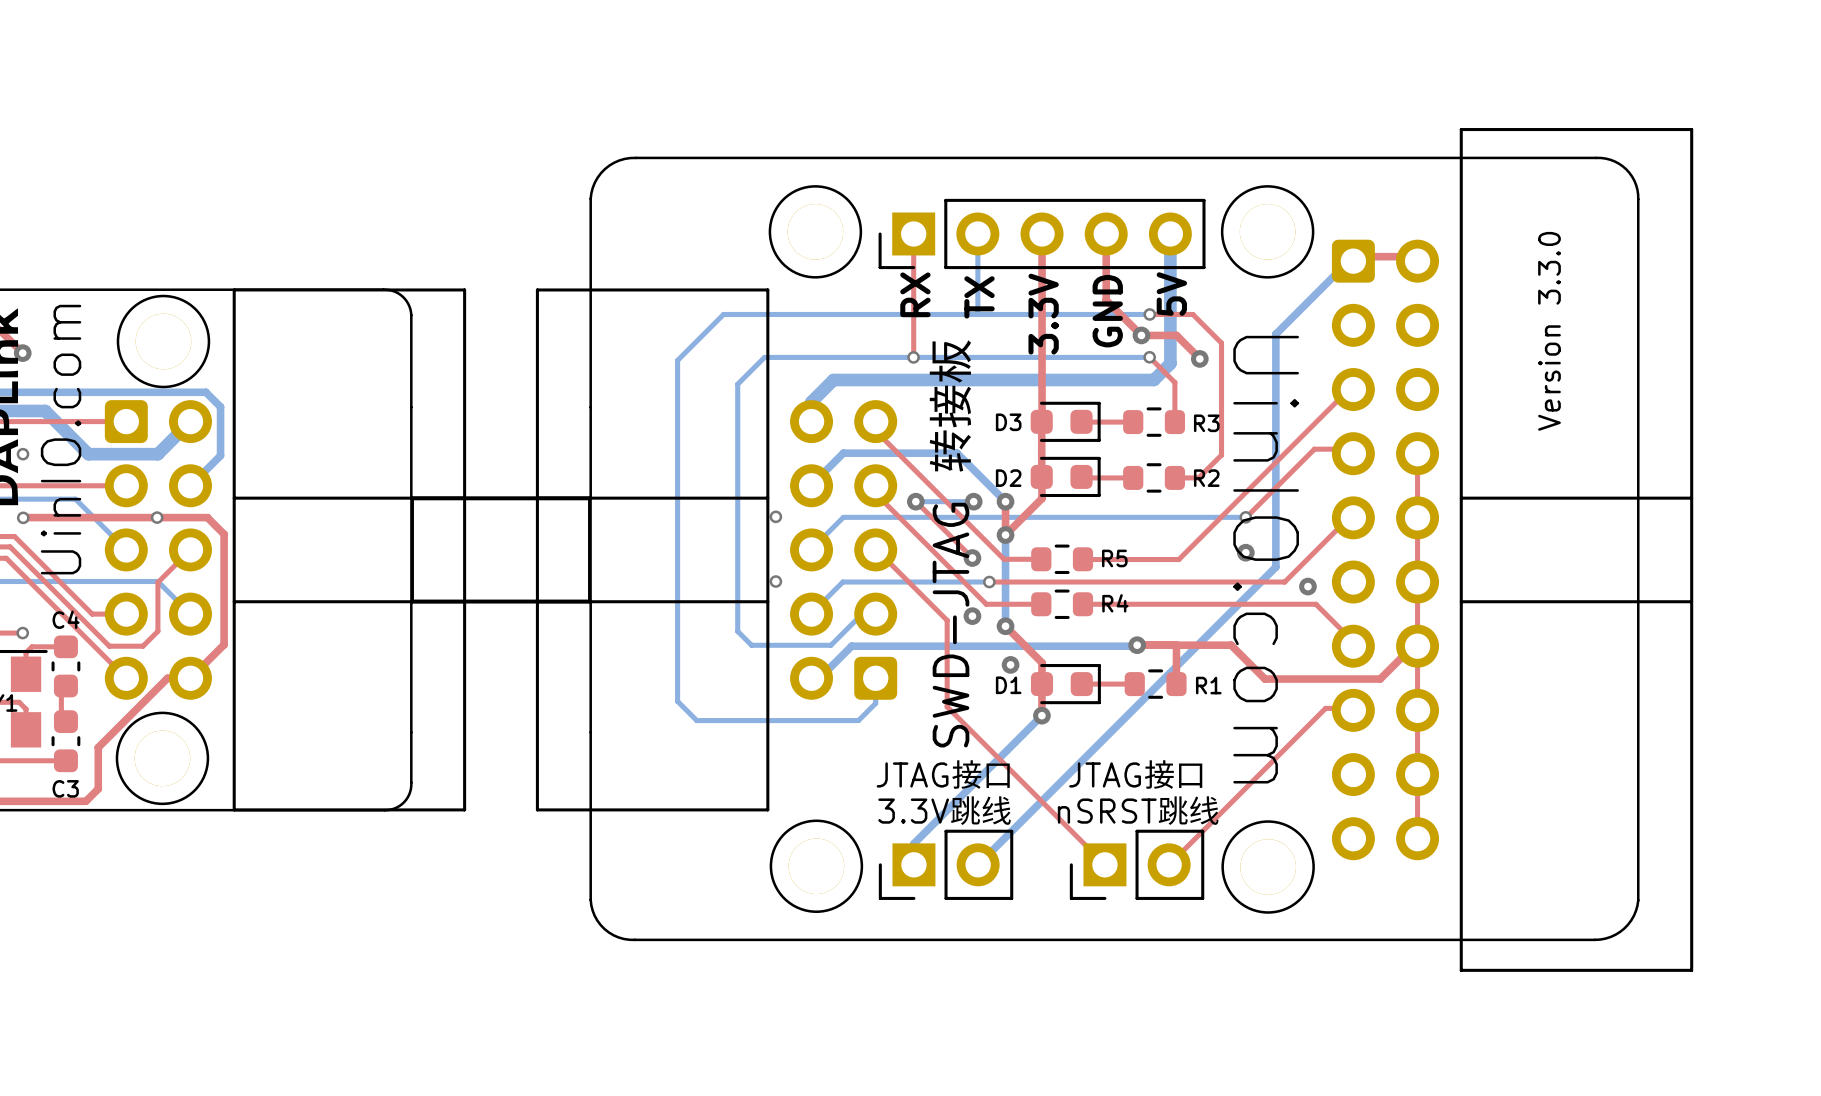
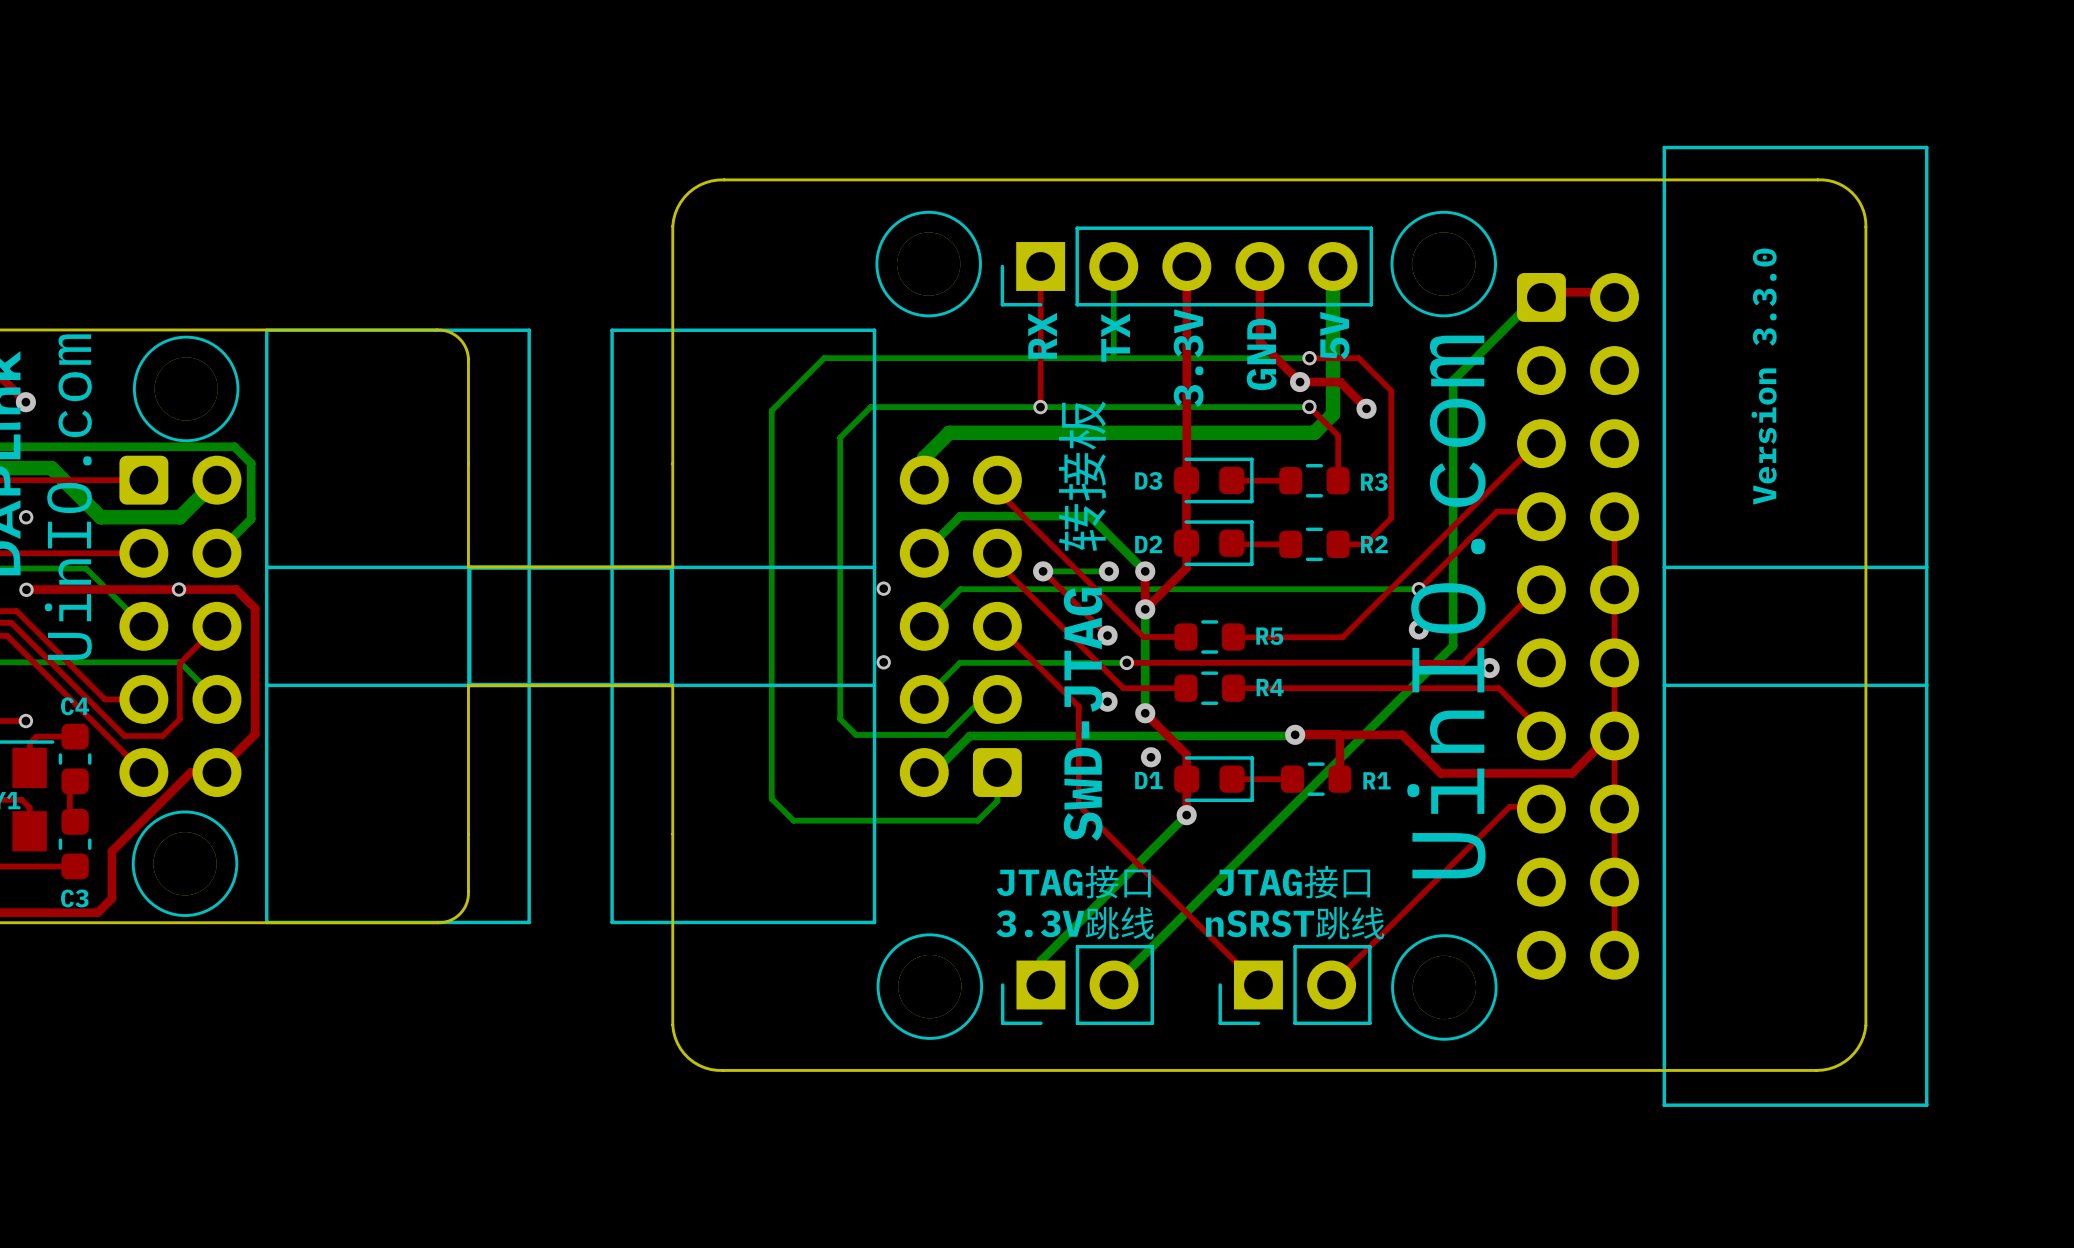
text rotation: 0° (1266, 559) -> 180° (1446, 607)

